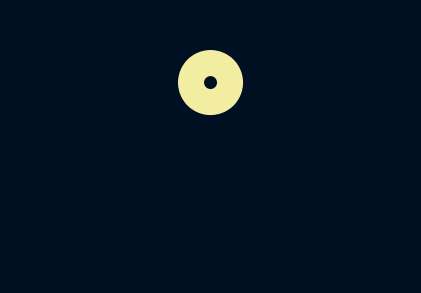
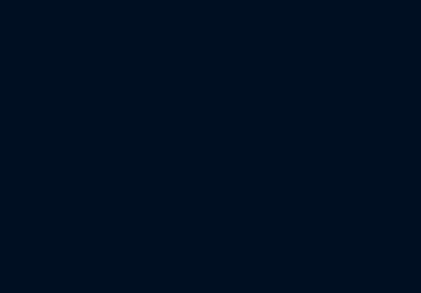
part: (210, 82) -> none

